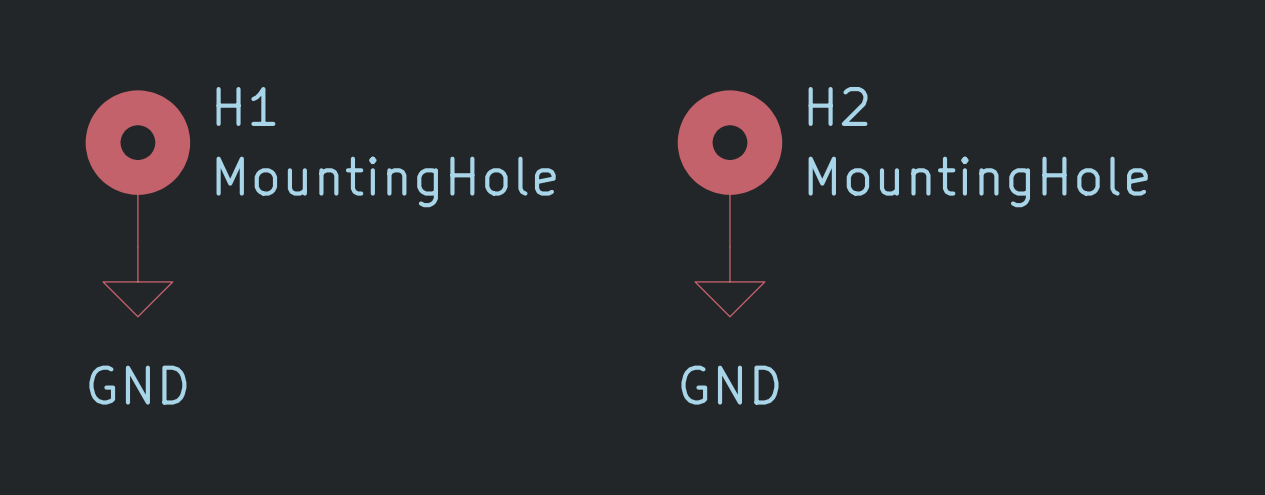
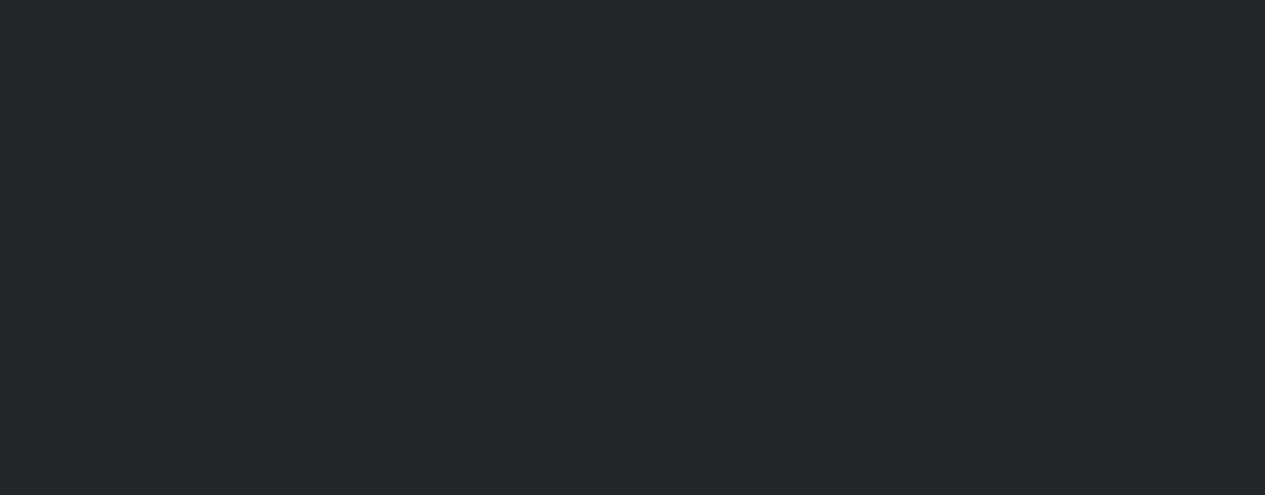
H1: MountingHole (137, 168) -> none
H2: MountingHole (729, 168) -> none
power symbol: GND (137, 281) -> none
power symbol: GND (729, 281) -> none

